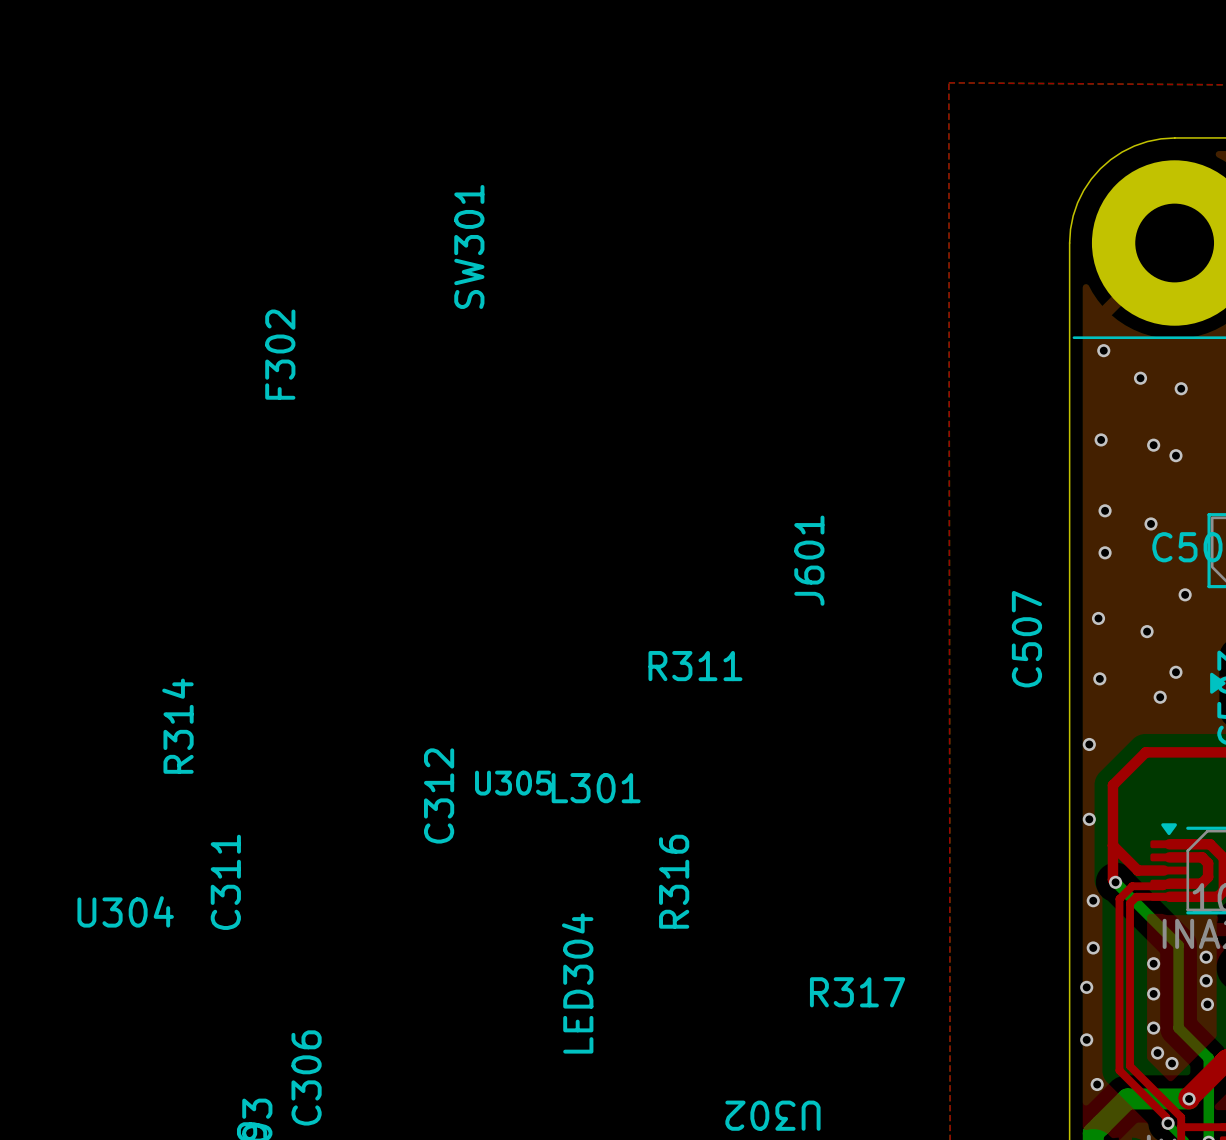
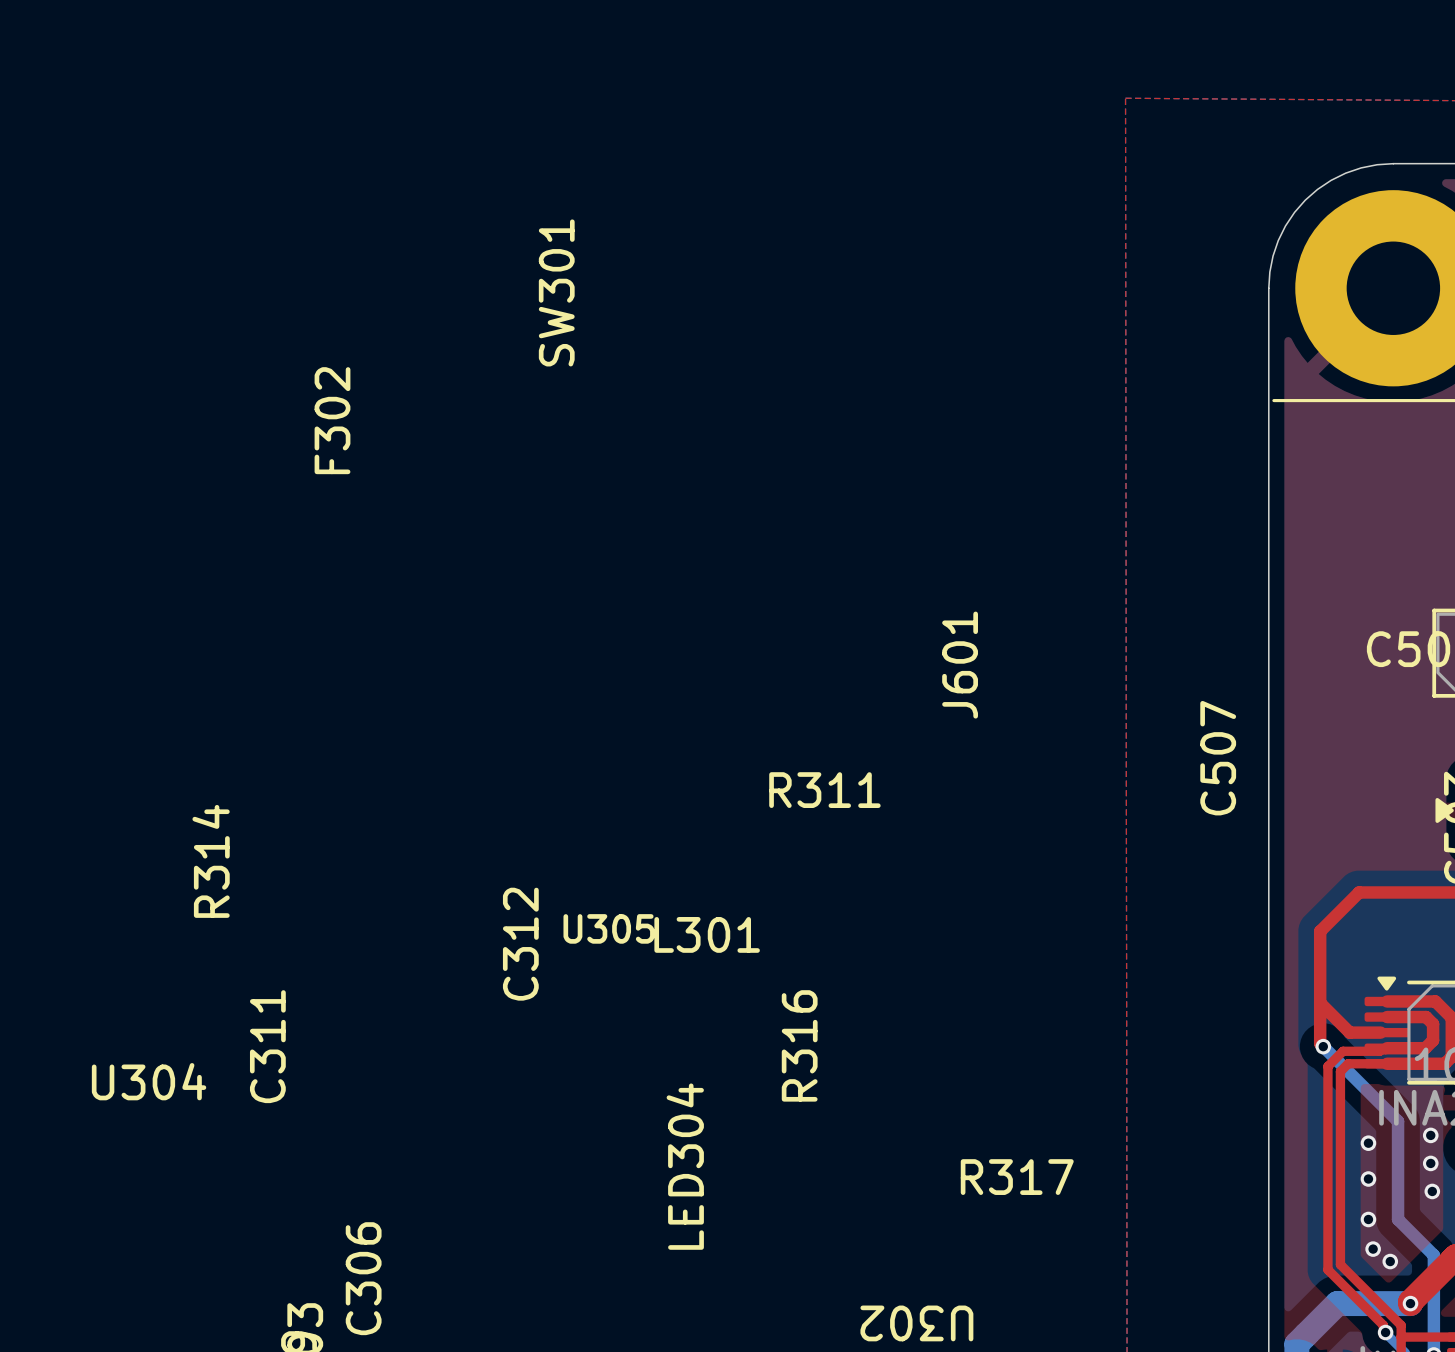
via: (1103, 350) -> none
via: (1140, 378) -> none
via: (1181, 388) -> none
via: (1101, 439) -> none
via: (1153, 445) -> none
via: (1175, 455) -> none
via: (1105, 510) -> none
via: (1151, 523) -> none
via: (1105, 552) -> none
via: (1185, 594) -> none
via: (1098, 618) -> none
via: (1147, 631) -> none
via: (1175, 672) -> none
via: (1099, 678) -> none
via: (1160, 697) -> none
via: (1089, 744) -> none
via: (1089, 819) -> none
via: (1093, 900) -> none
via: (1093, 947) -> none
via: (1086, 987) -> none
via: (1086, 1039) -> none
via: (1097, 1084) -> none

